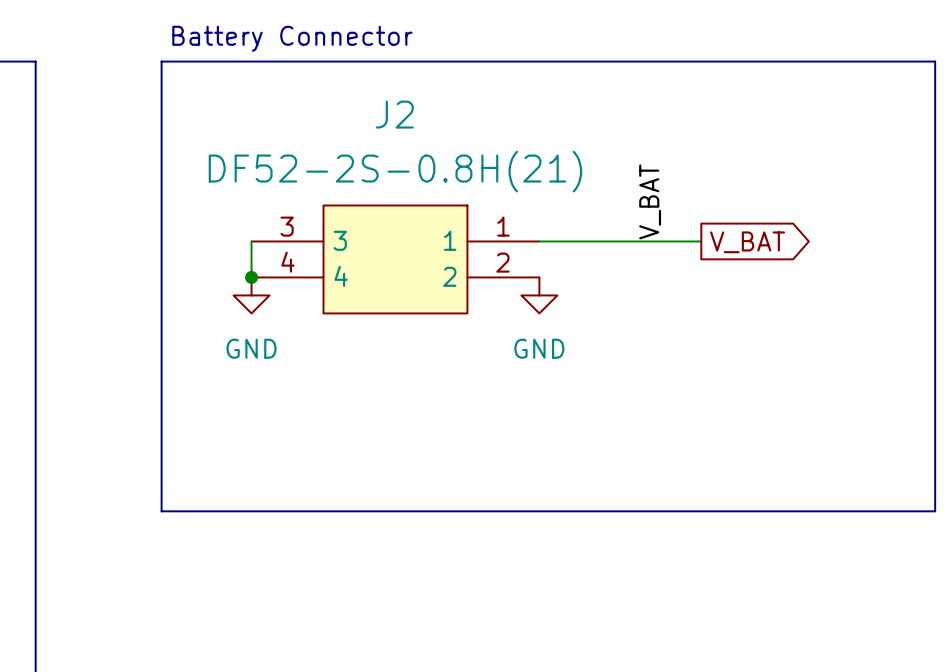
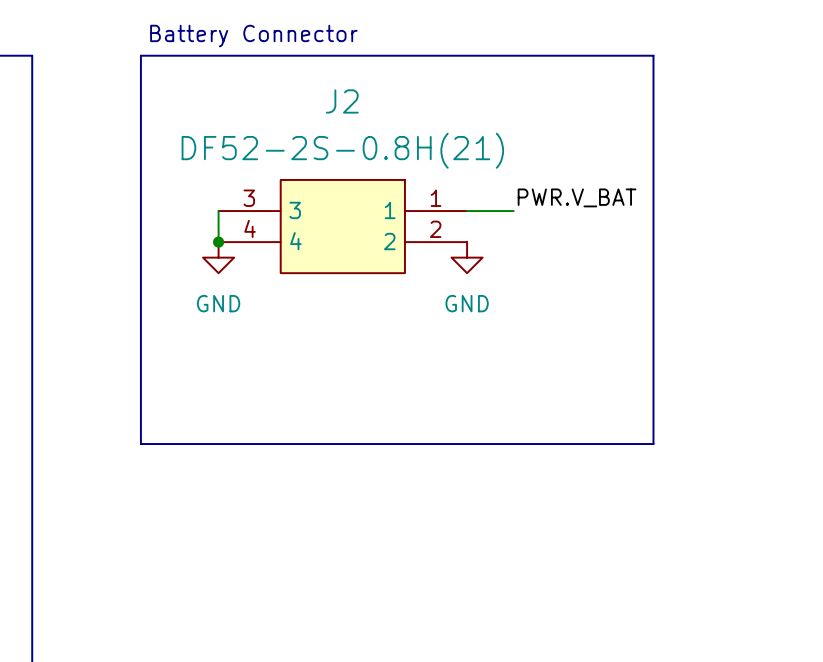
line: (755, 61) (935, 61) (935, 511) (755, 511) -> (653, 55) (653, 444)
label: V_BAT (650, 201) -> PWR.V_BAT (577, 197)
wire: (593, 241) (701, 241) -> none
global label: V_BAT (747, 242) -> none

